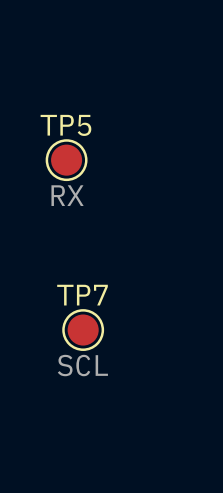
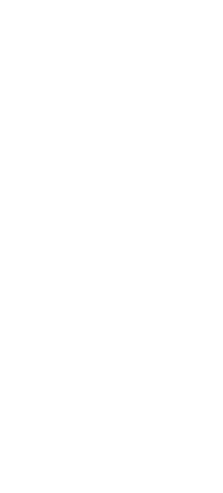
TP5: RX (66, 160) -> none
TP7: SCL (83, 330) -> none

